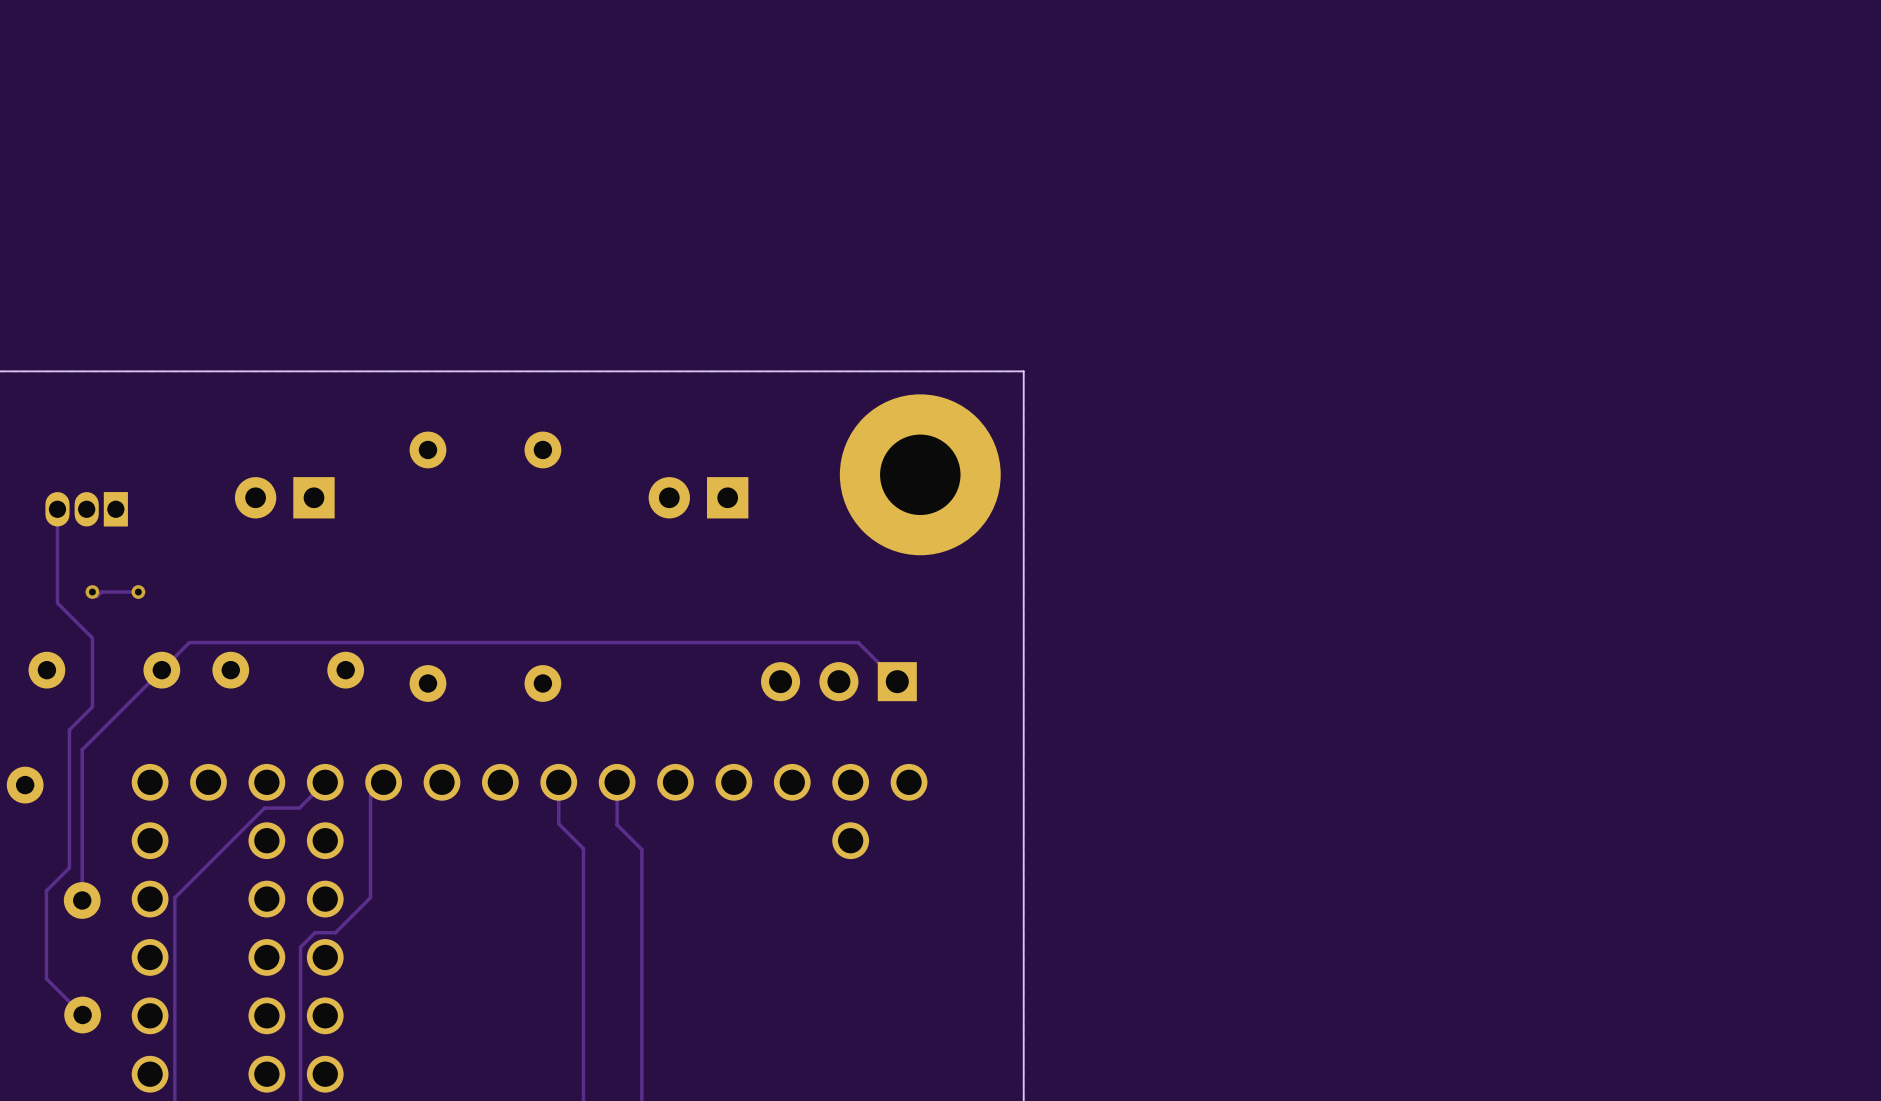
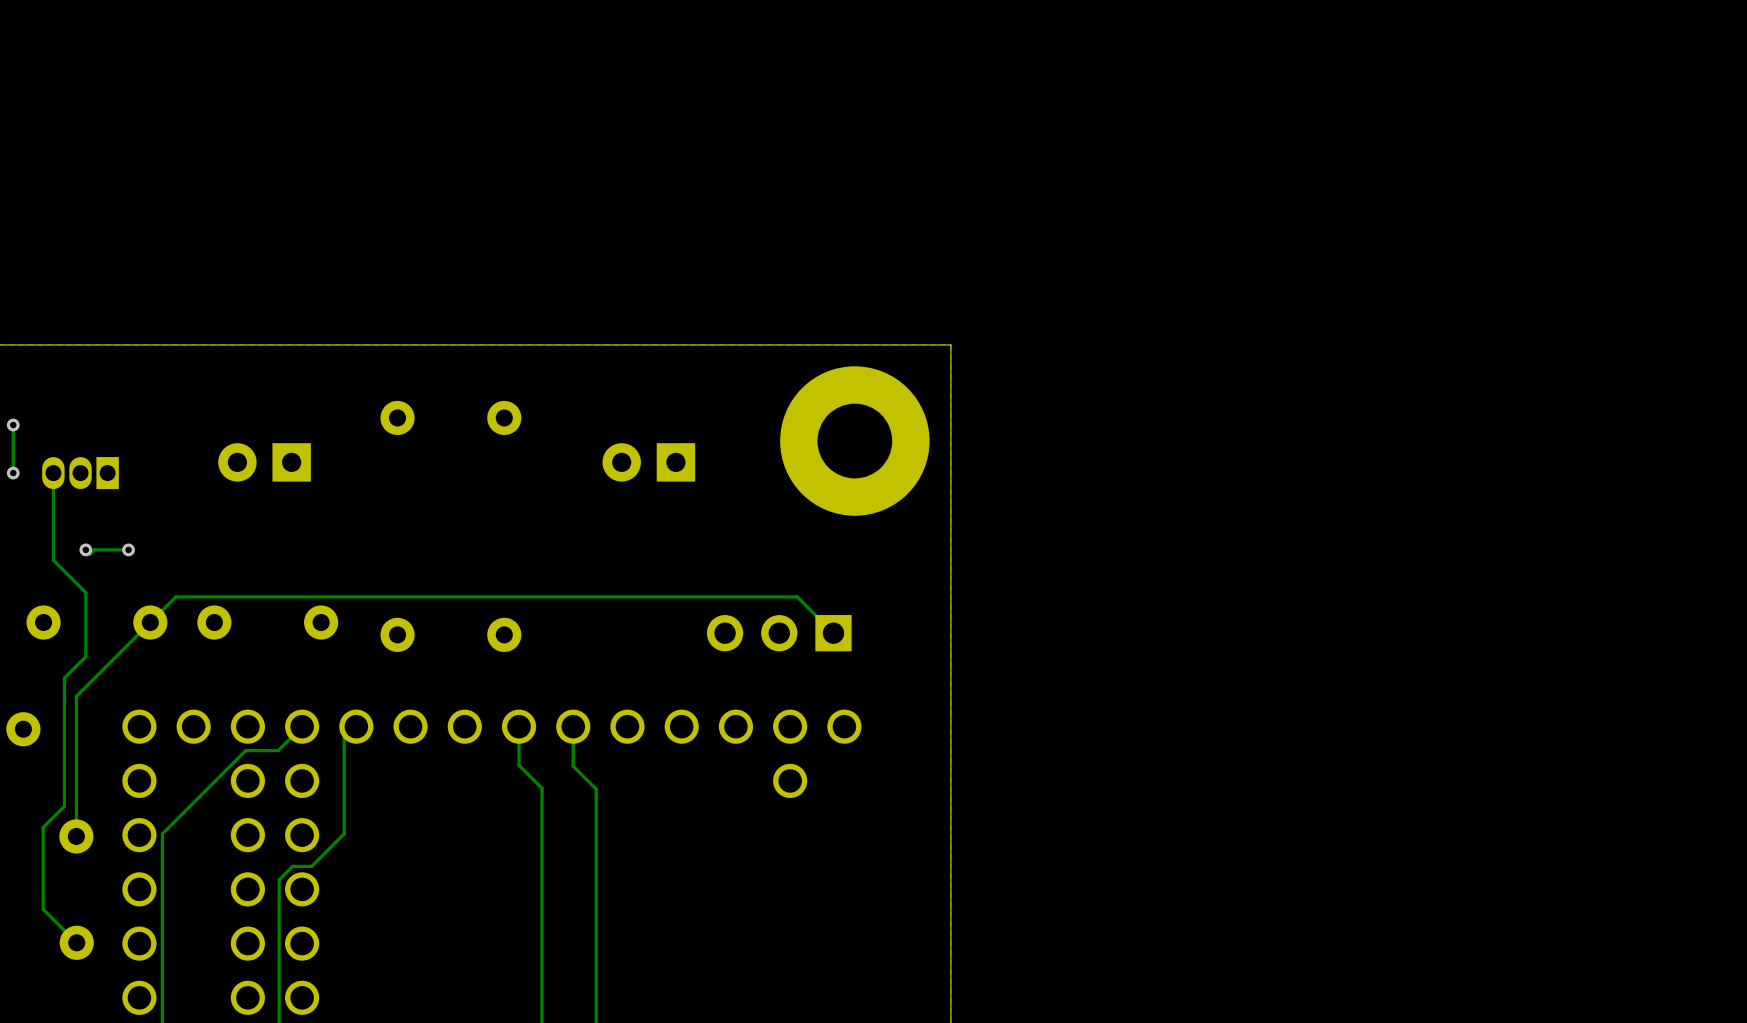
track: none -> (13, 425) (13, 473)
via: none -> (13, 425)
via: none -> (13, 473)

